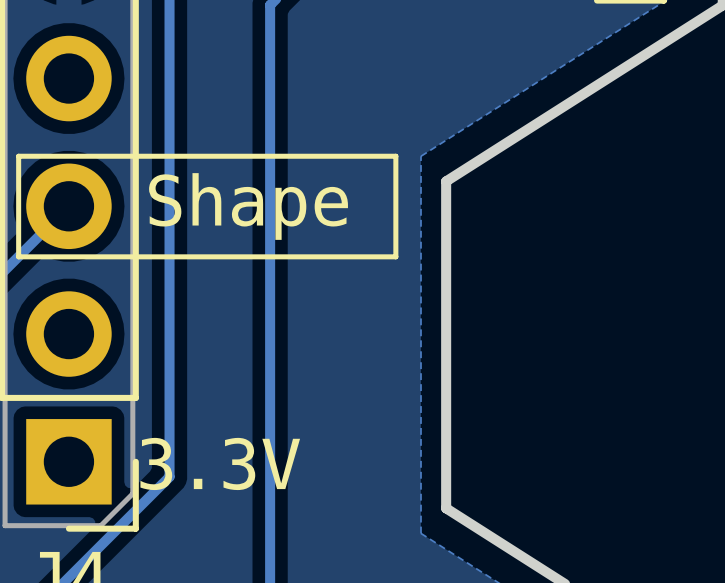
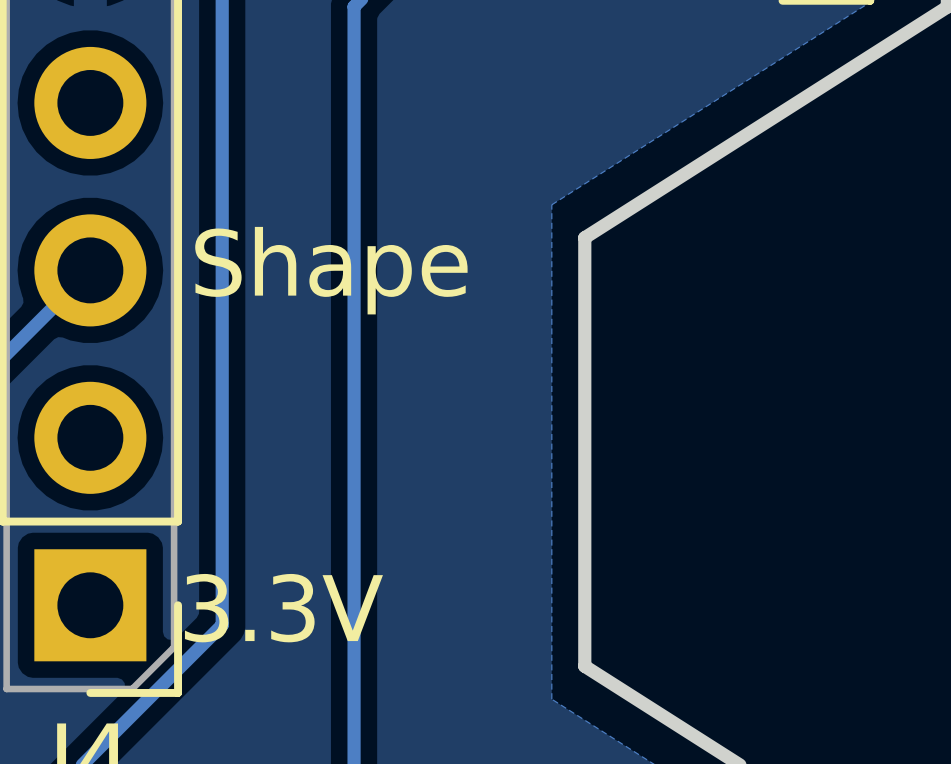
line: (395, 156) (18, 156) (18, 256) (395, 256) (395, 156) -> none

